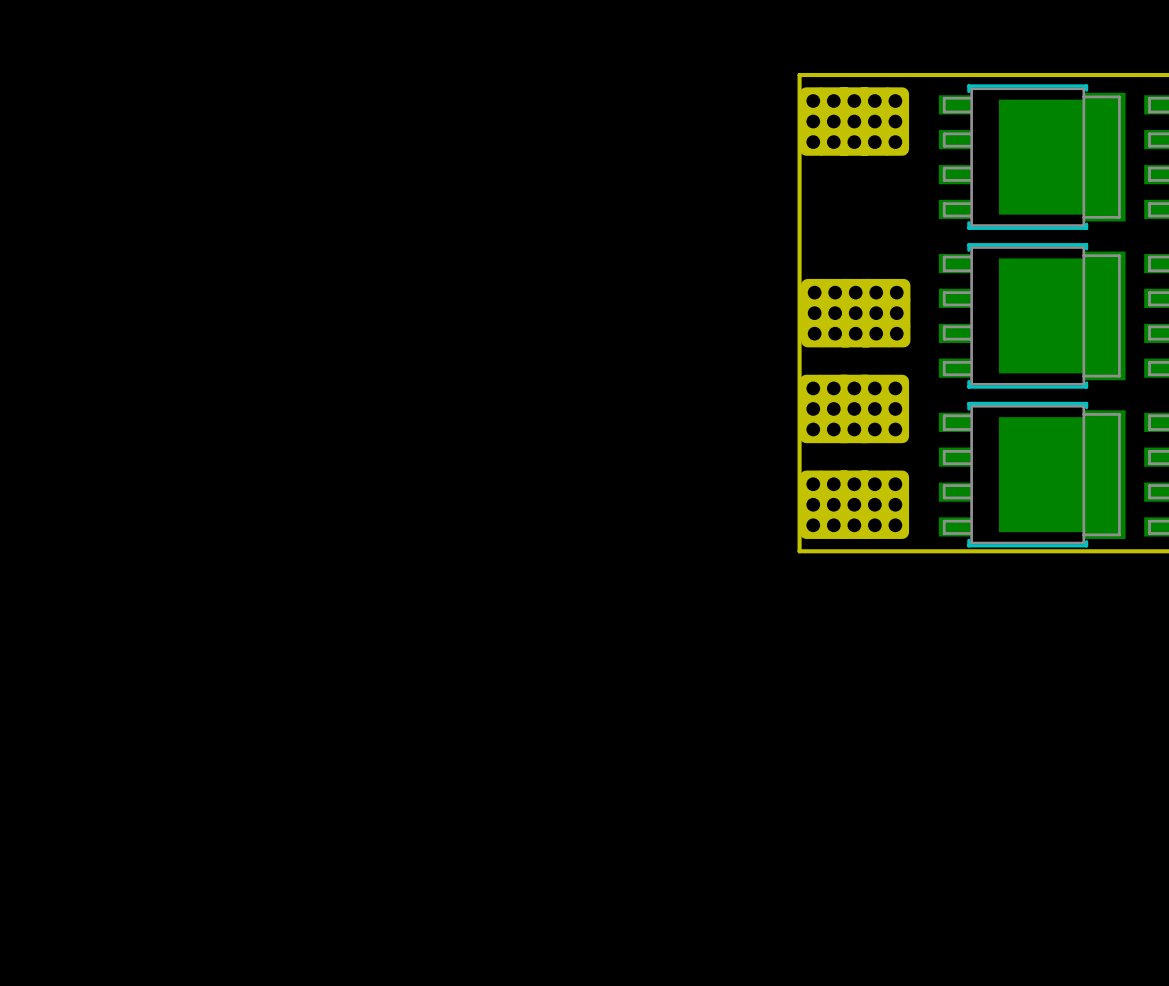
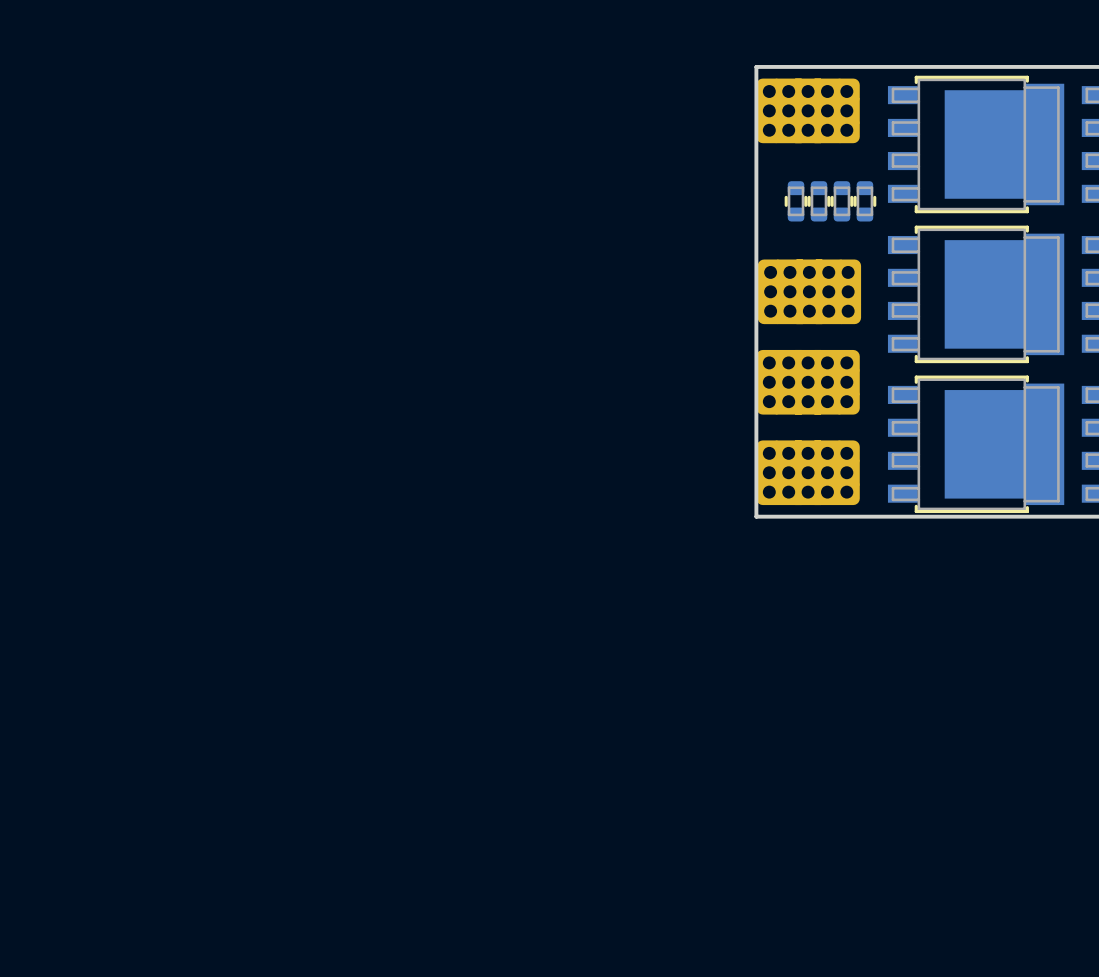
part: none -> (796, 201)
part: none -> (818, 201)
part: none -> (841, 201)
part: none -> (864, 201)

